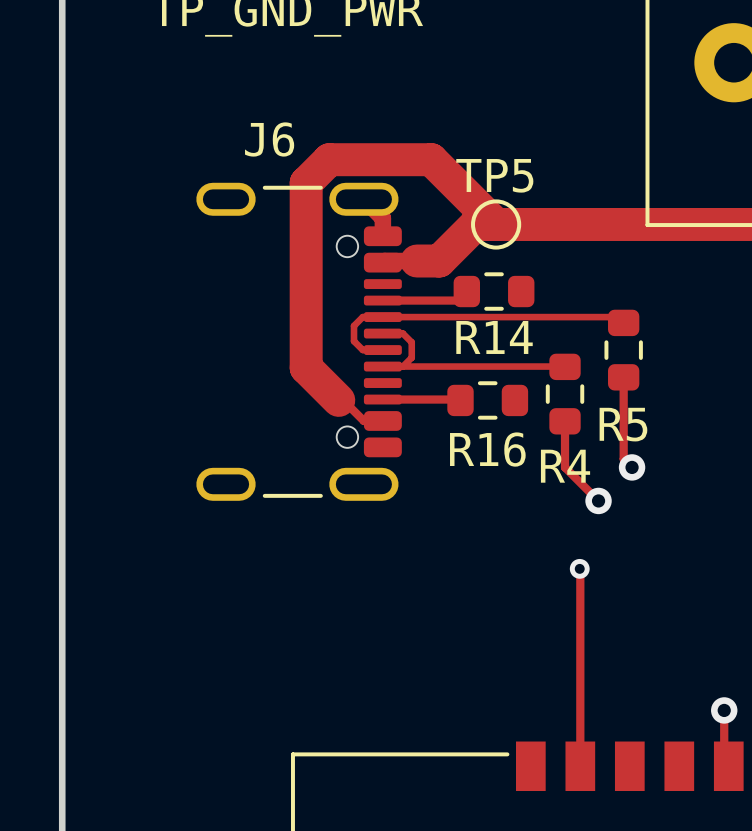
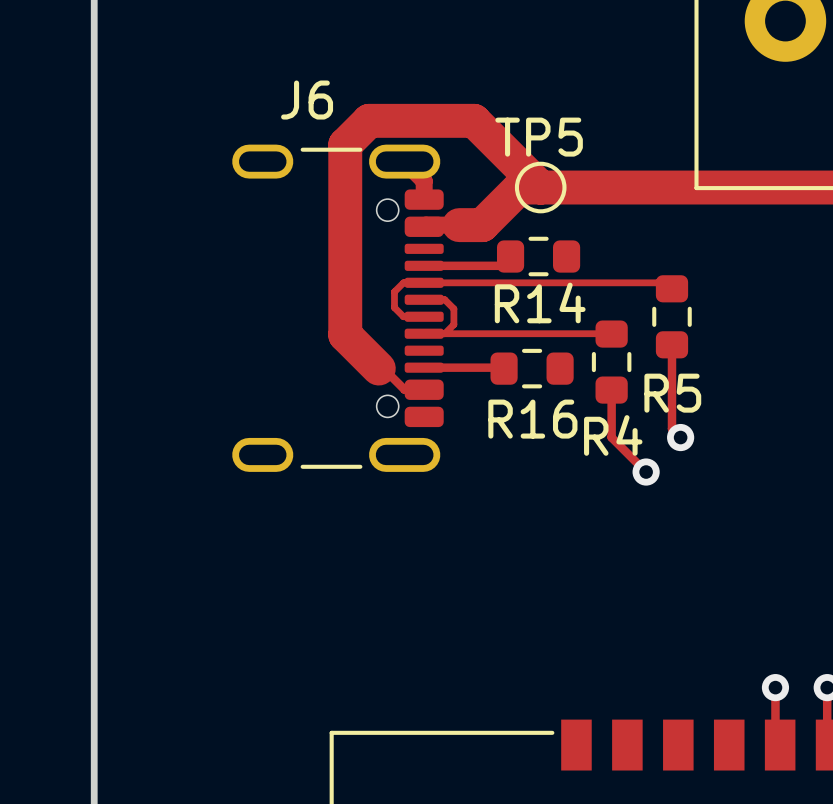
track: (579, 568) (580, 766) -> none
via: (579, 568) -> none

